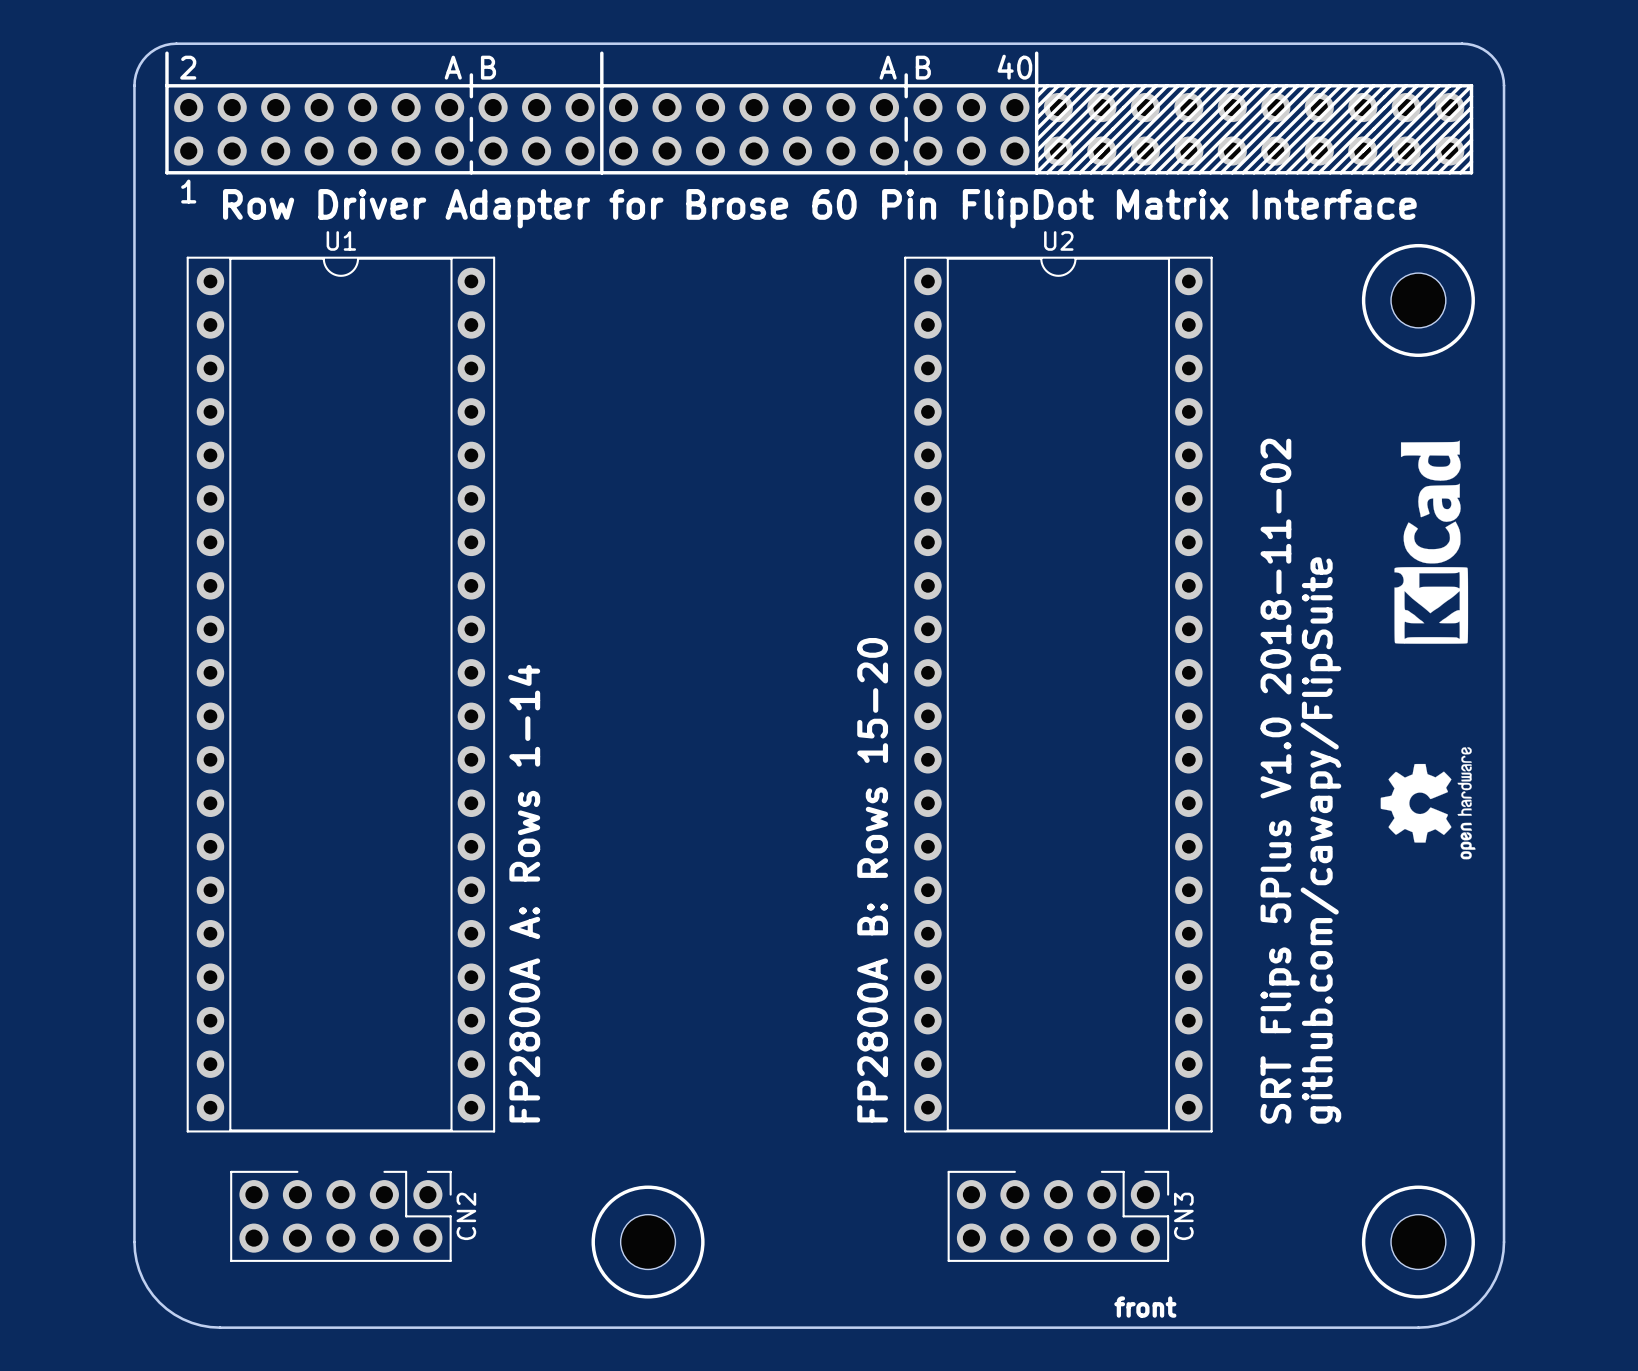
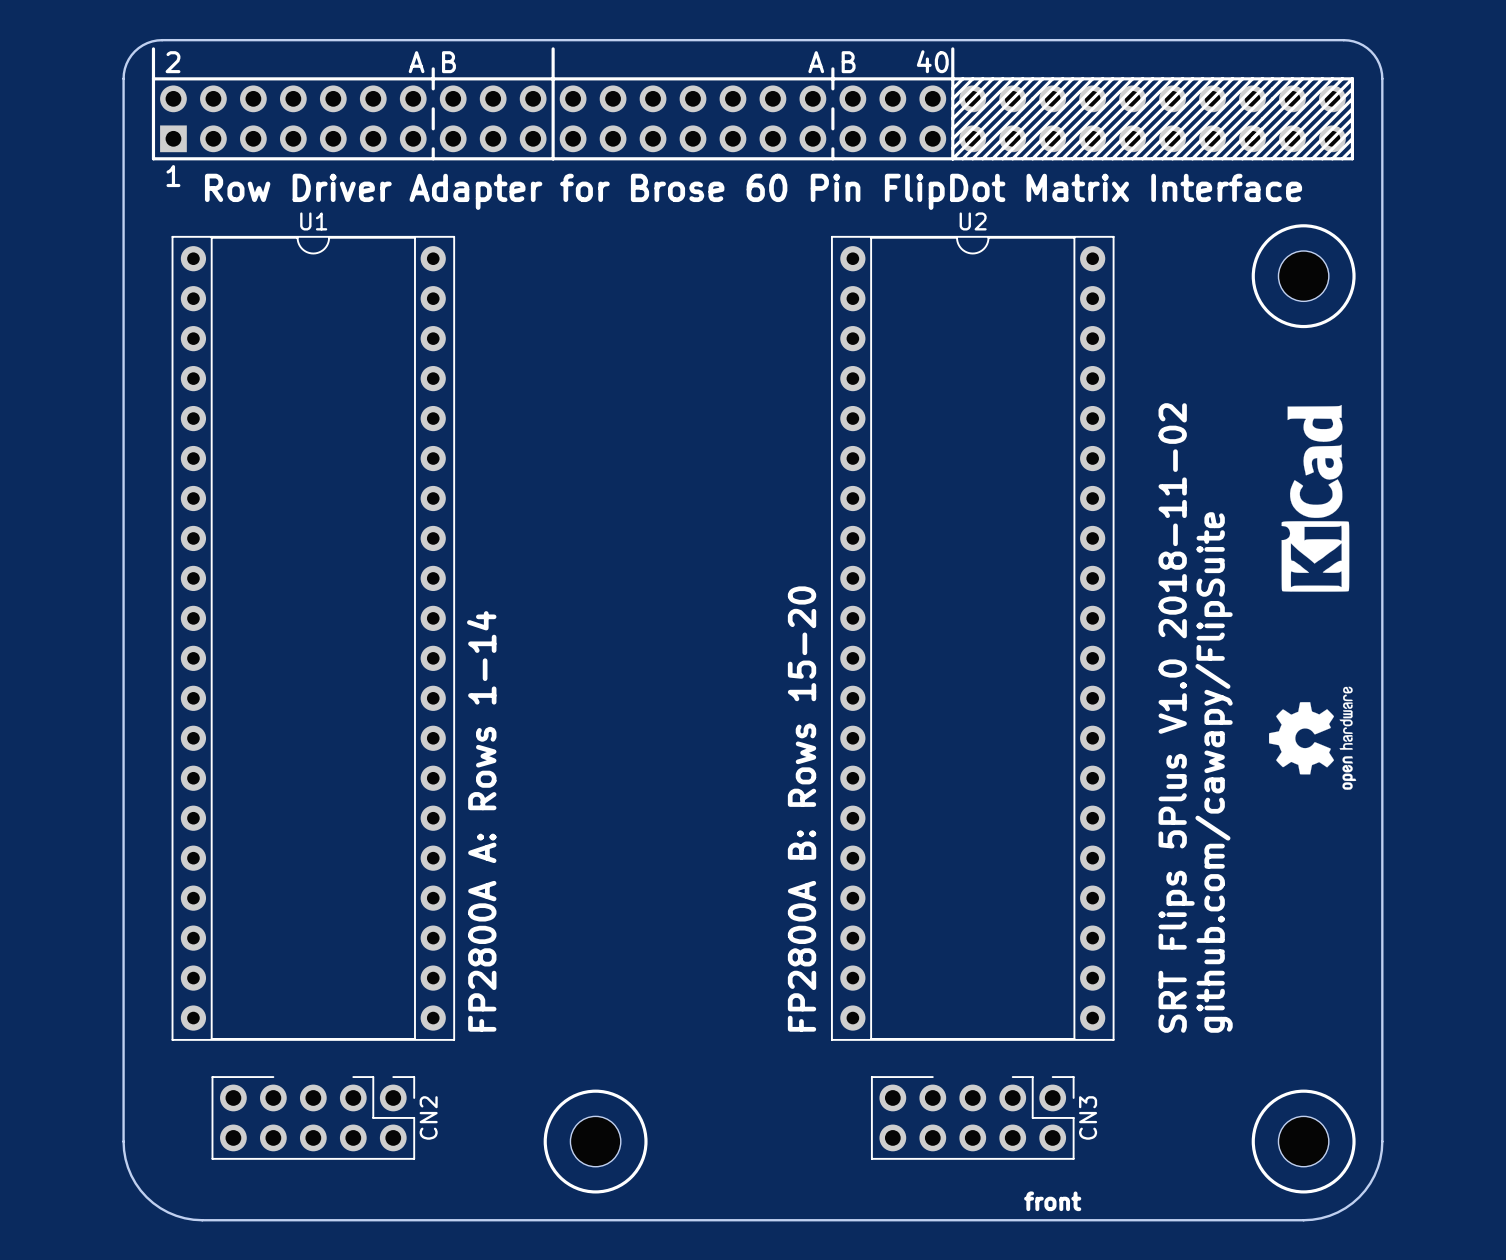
part footprint: [174, 92, 1465, 166] -> [160, 85, 1346, 153]

